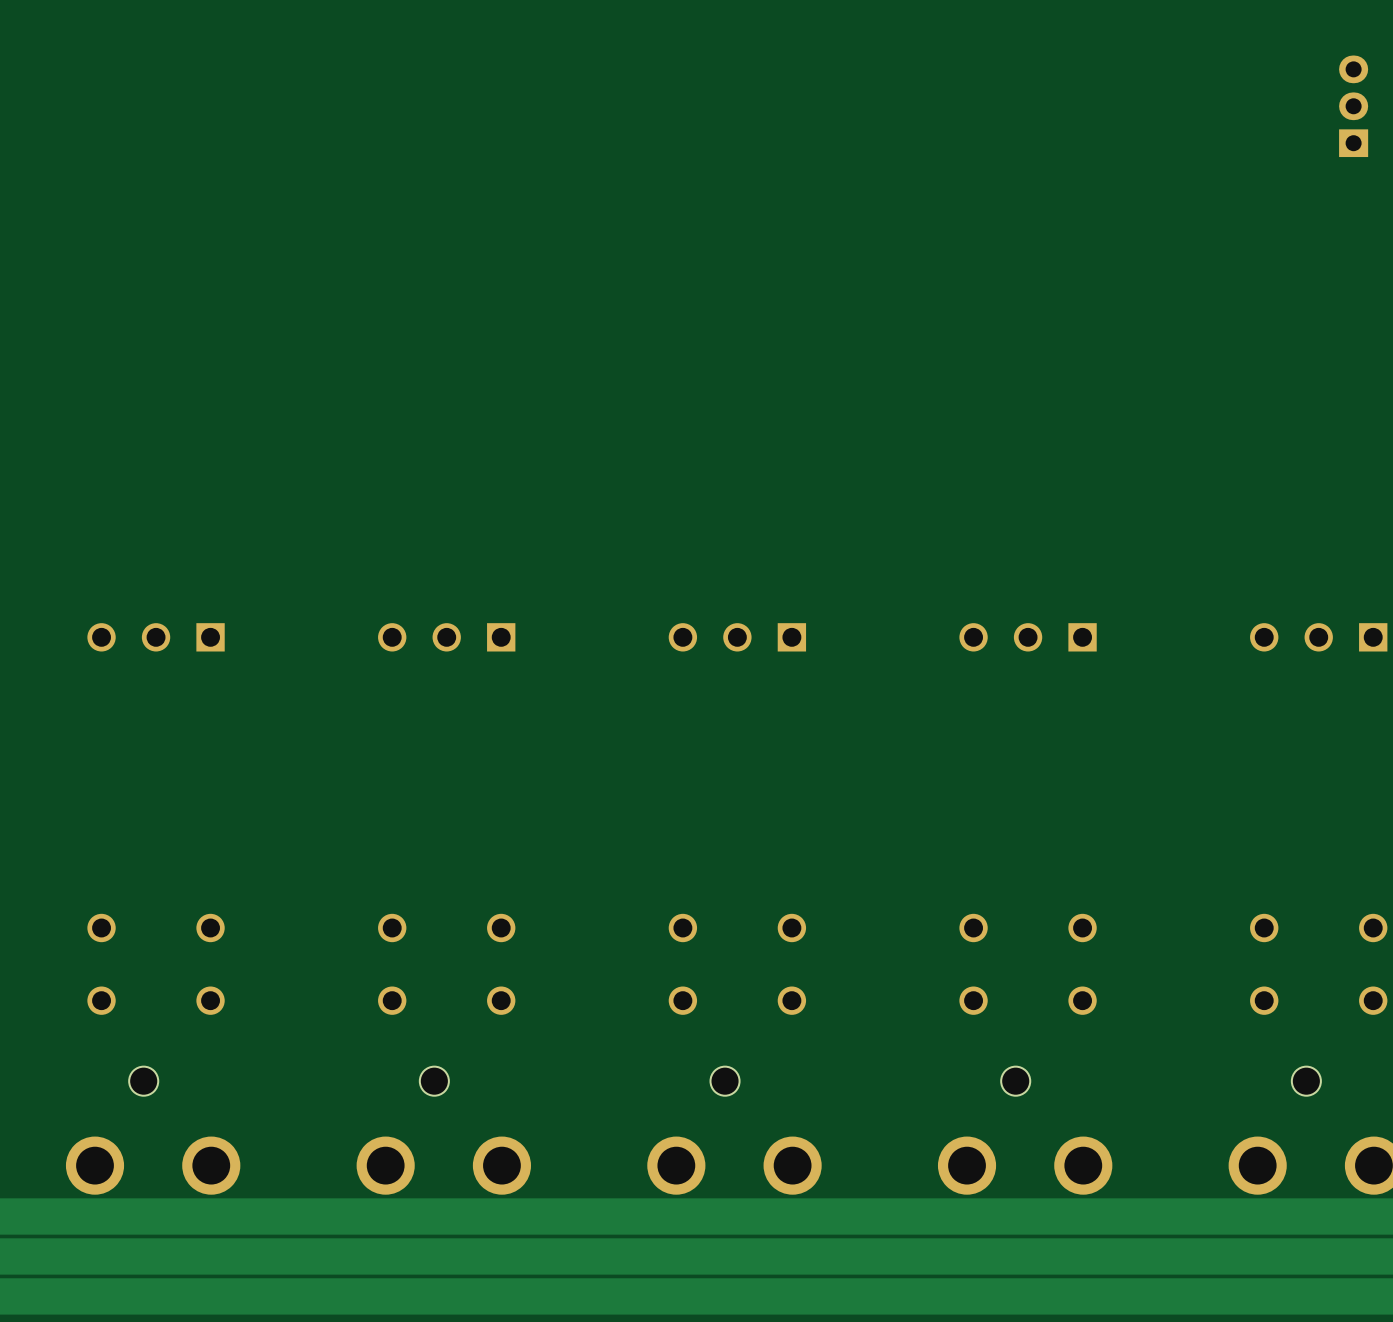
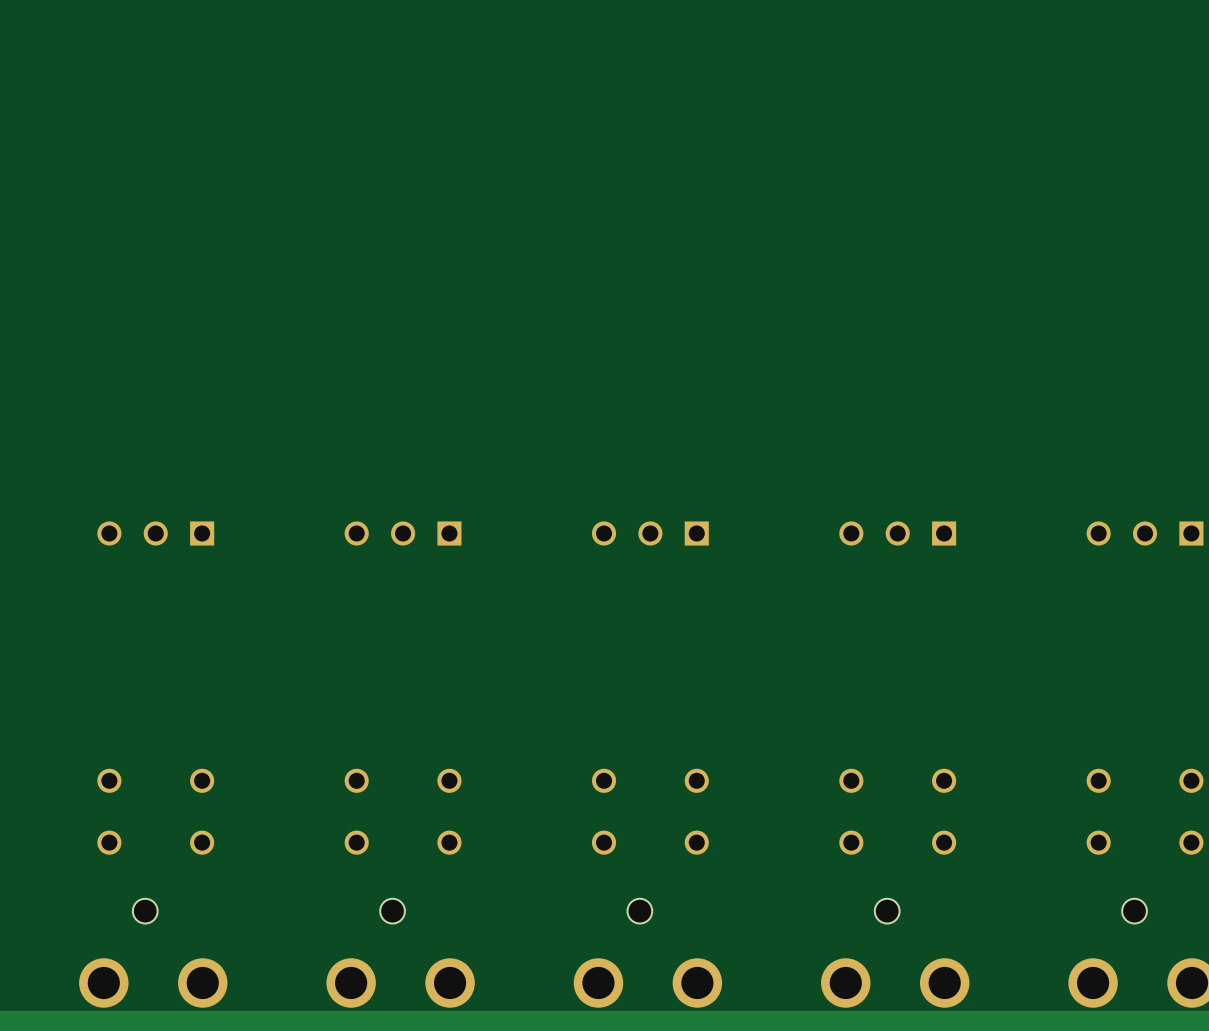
part: (1353, 106) -> none

